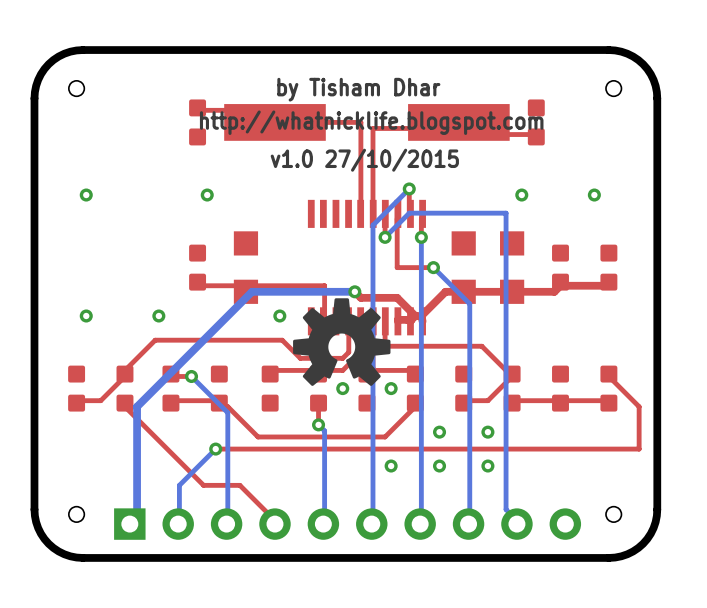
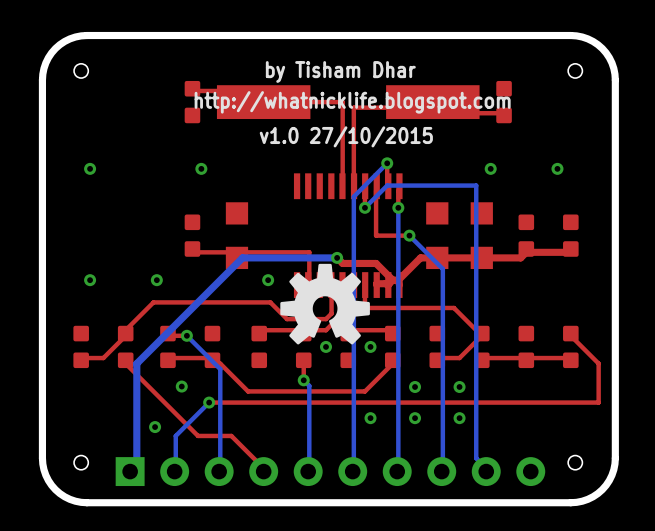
via: none -> (181, 386)
via: none -> (155, 427)

